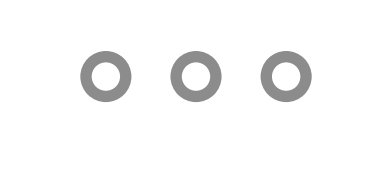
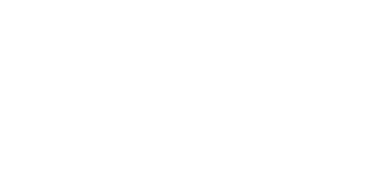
part: (196, 76) -> none

